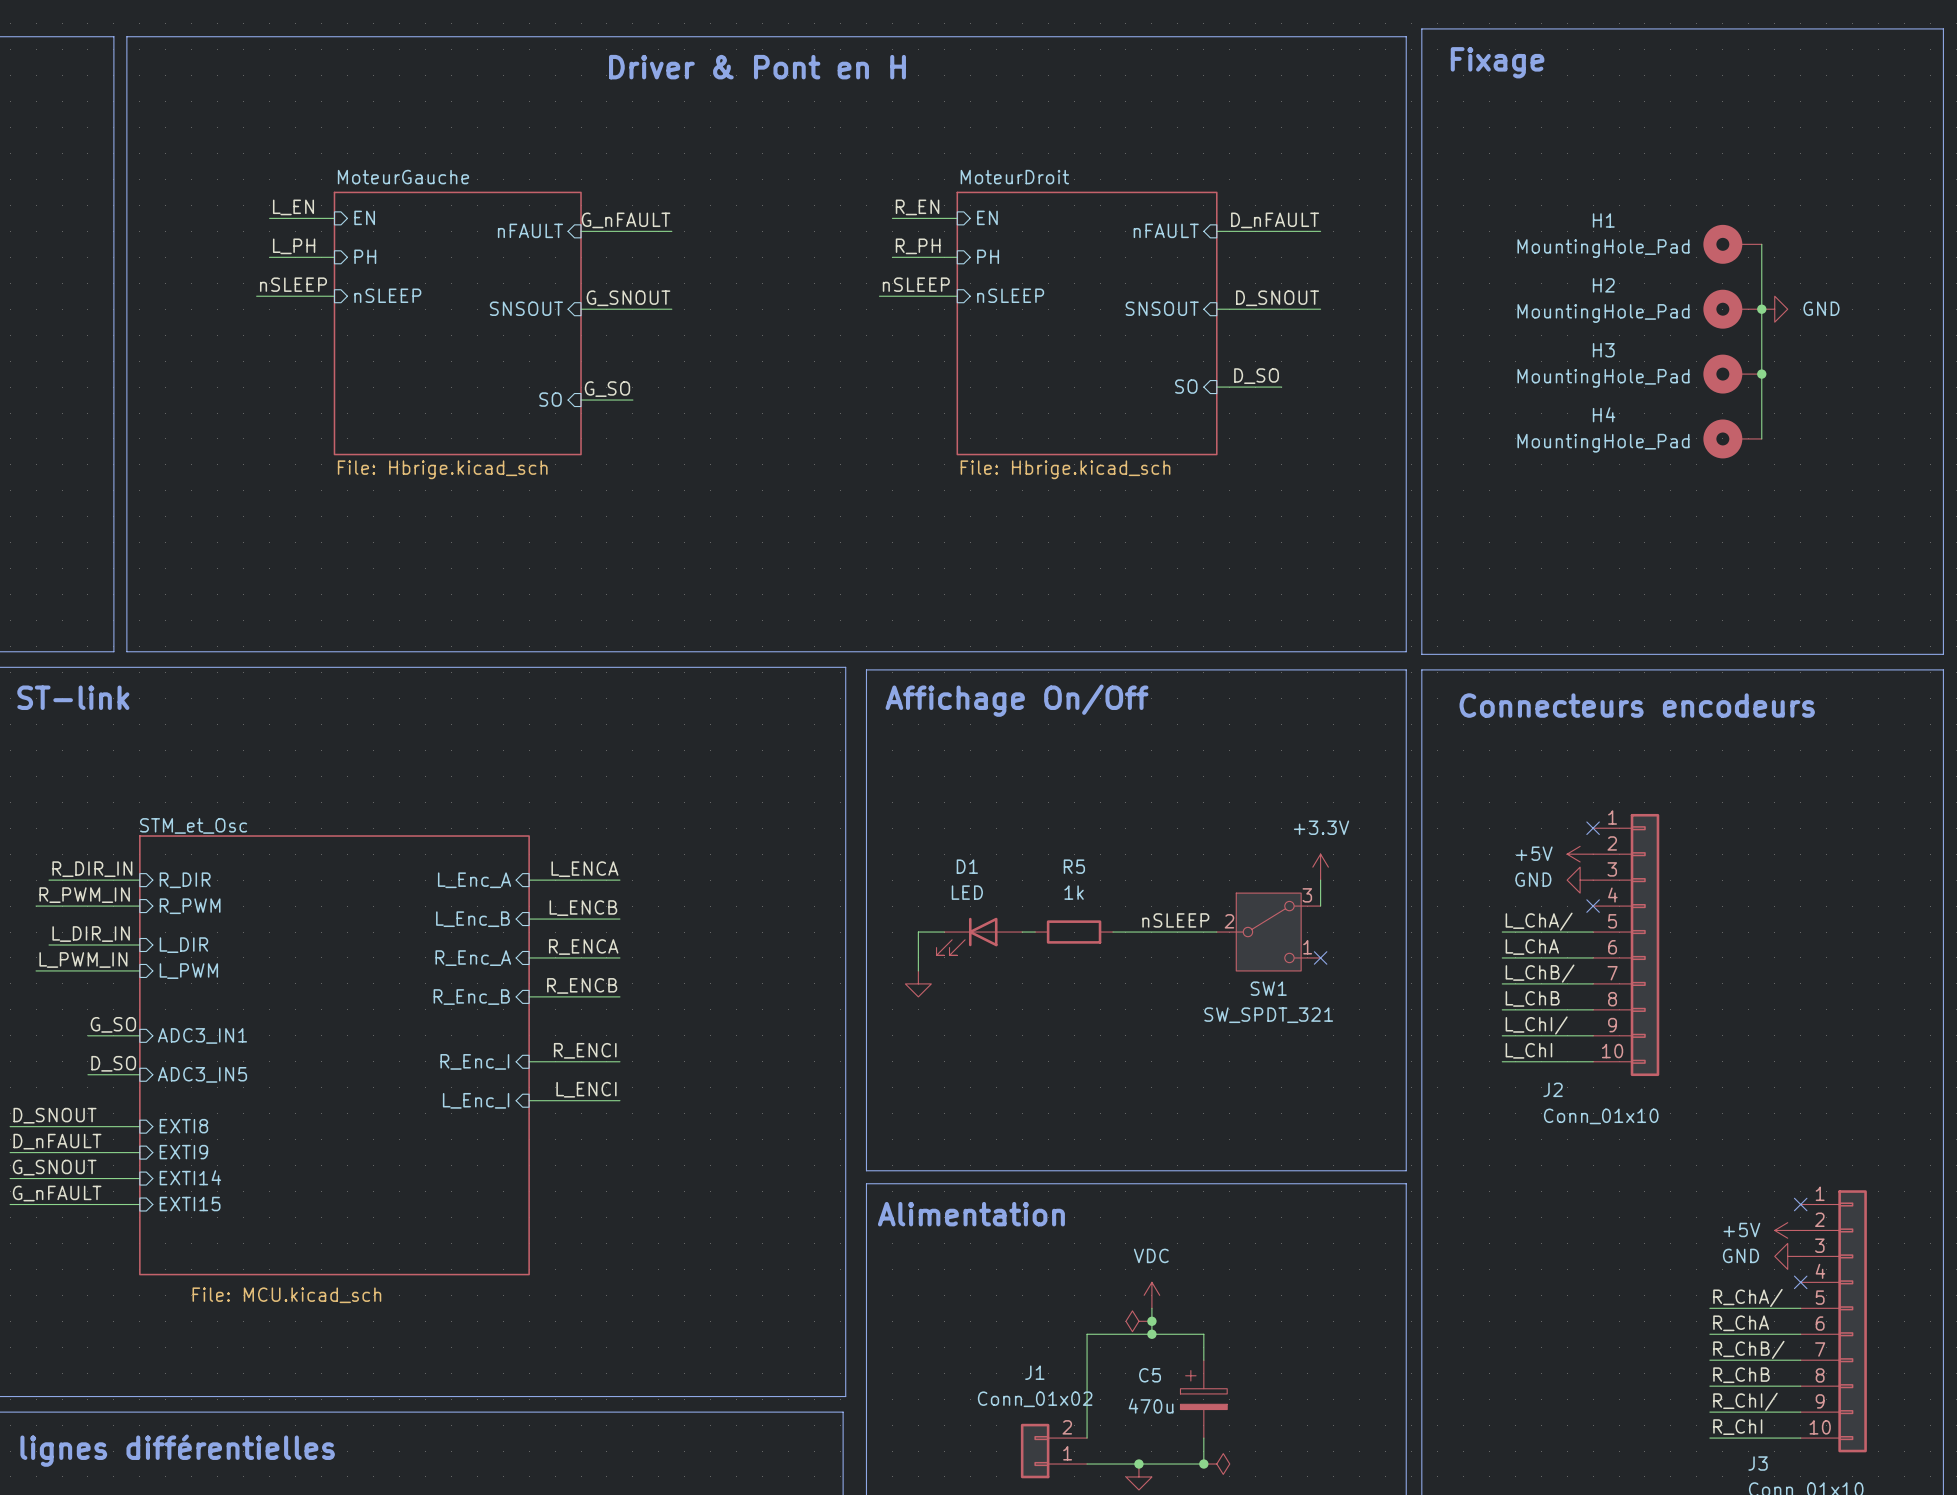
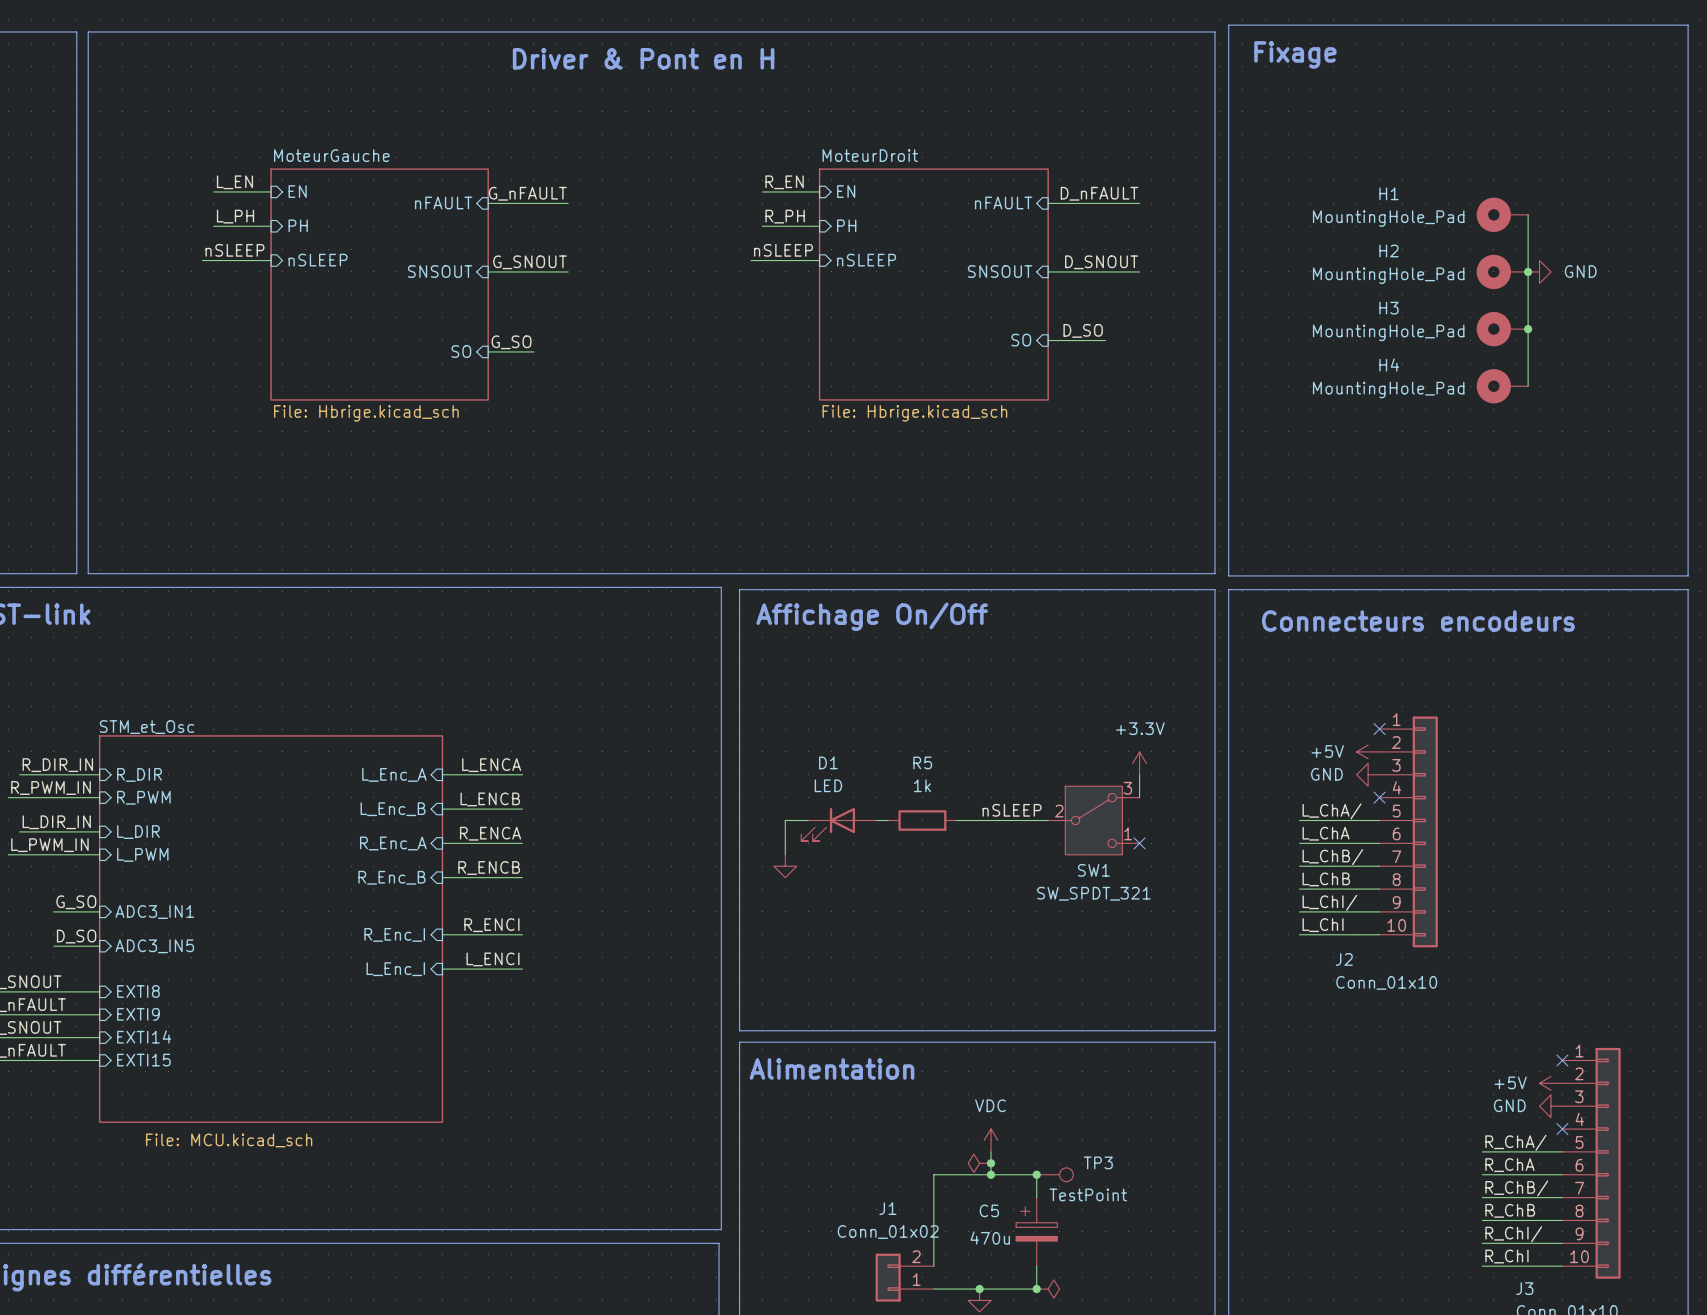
junction: none -> (1036, 1174)
TP3: none -> TestPoint (1055, 1174)

